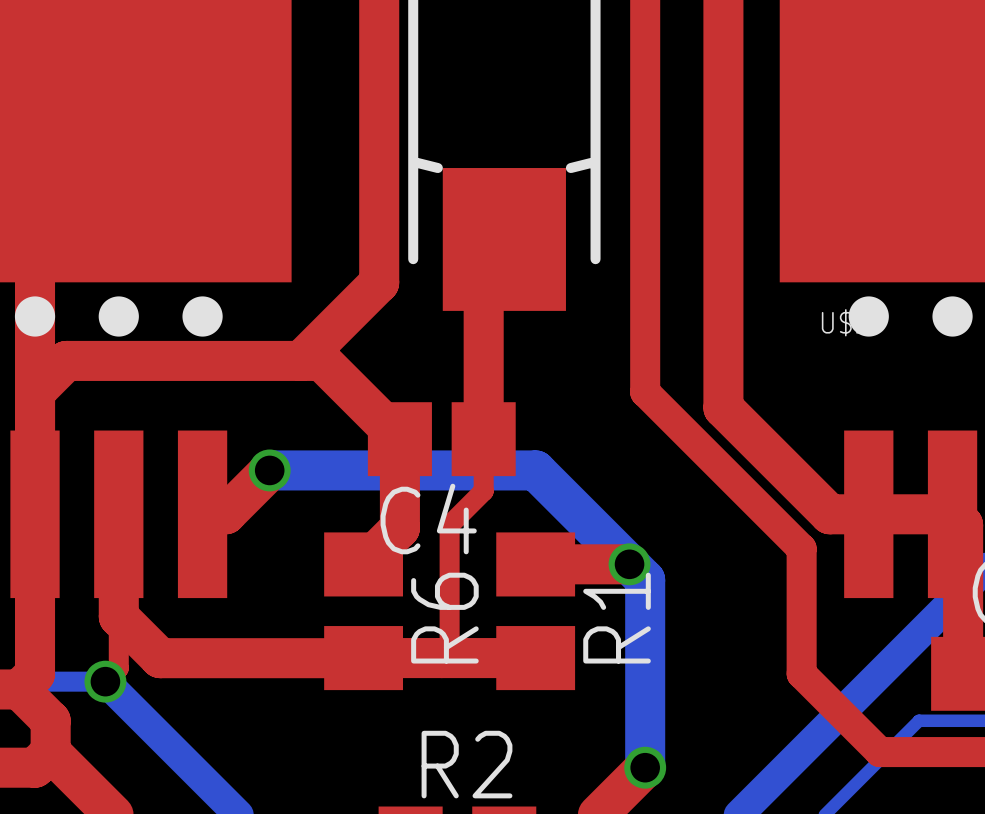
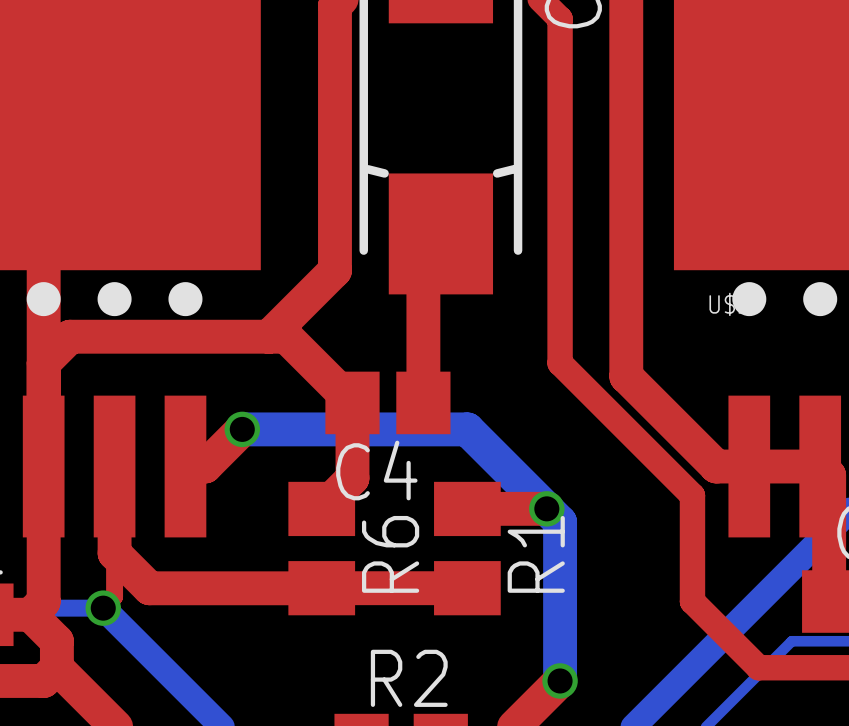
top track: (483, 439) (483, 491) (449, 525) (449, 650) (441, 658) -> none

